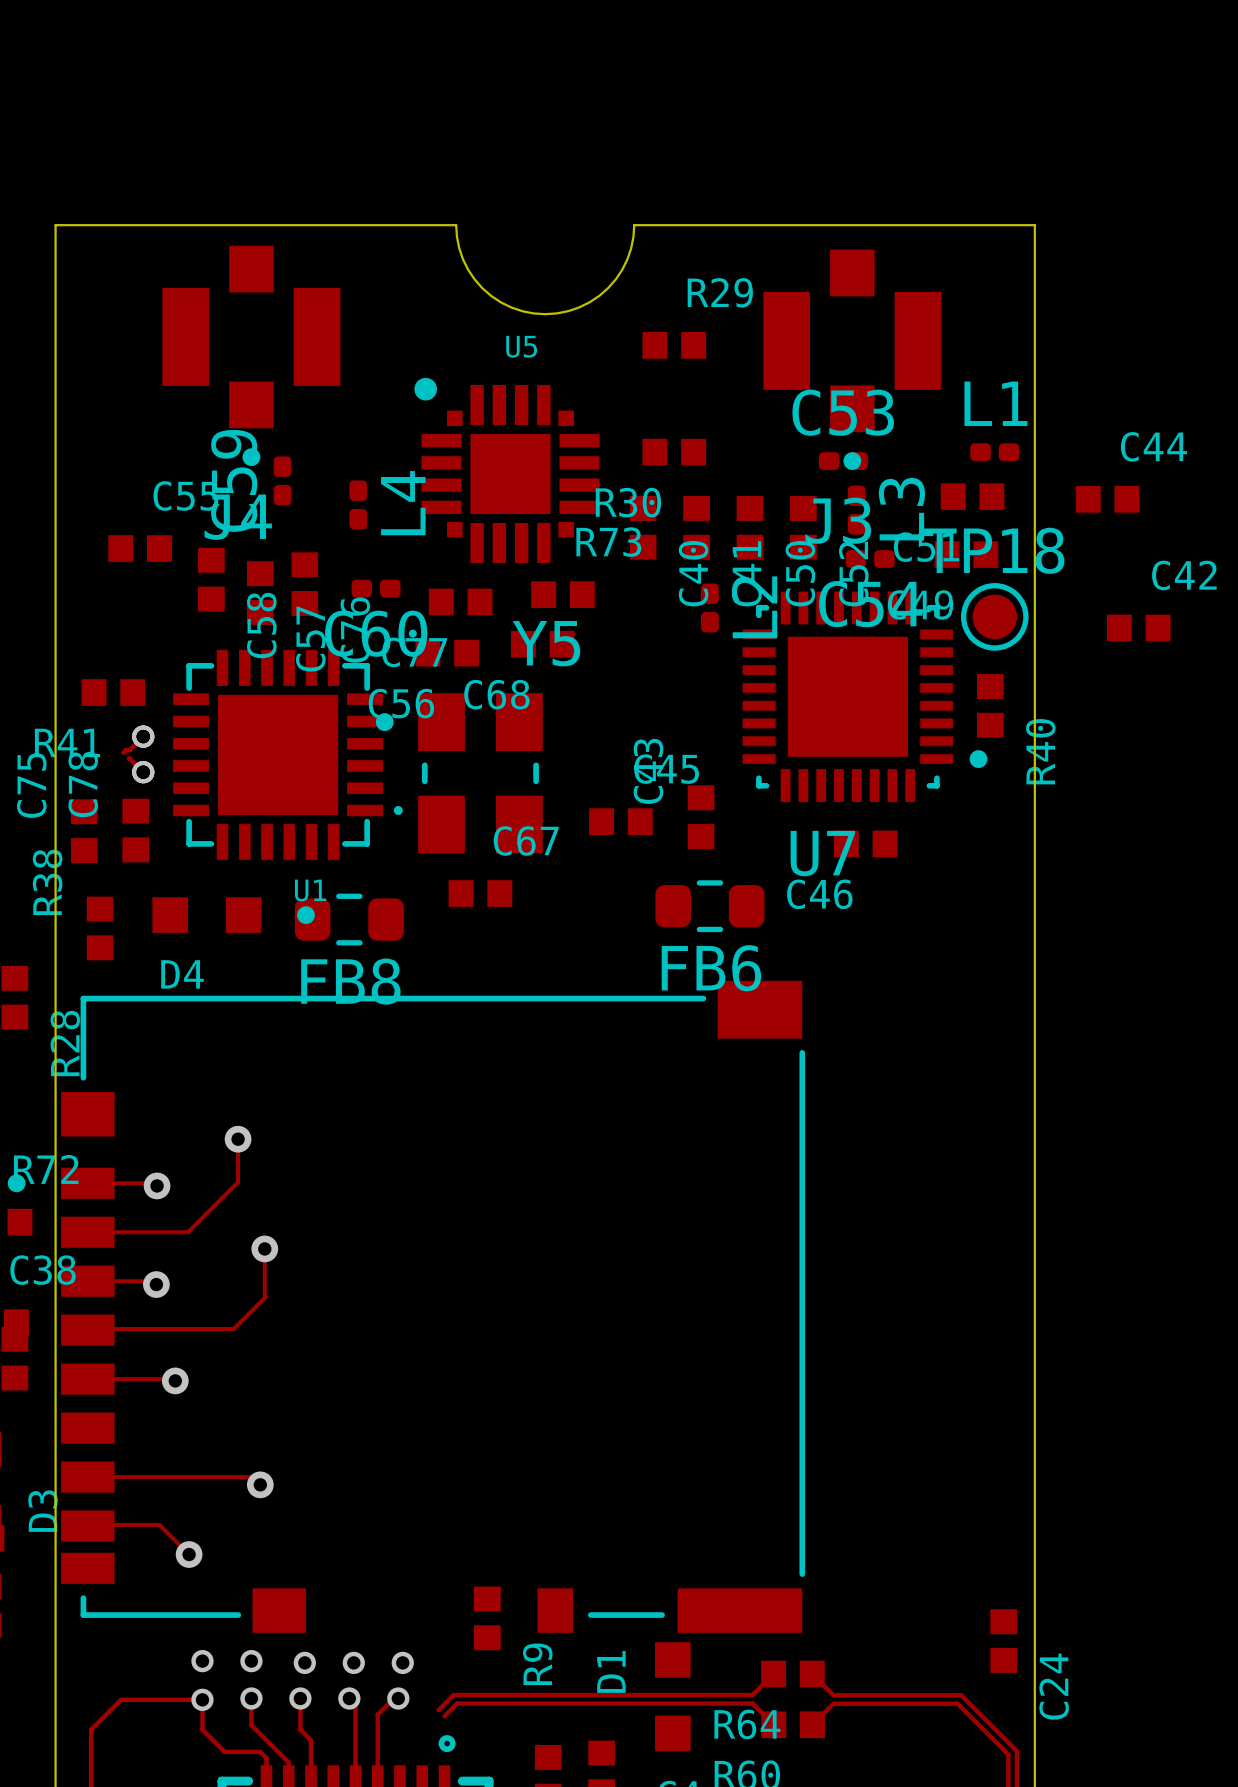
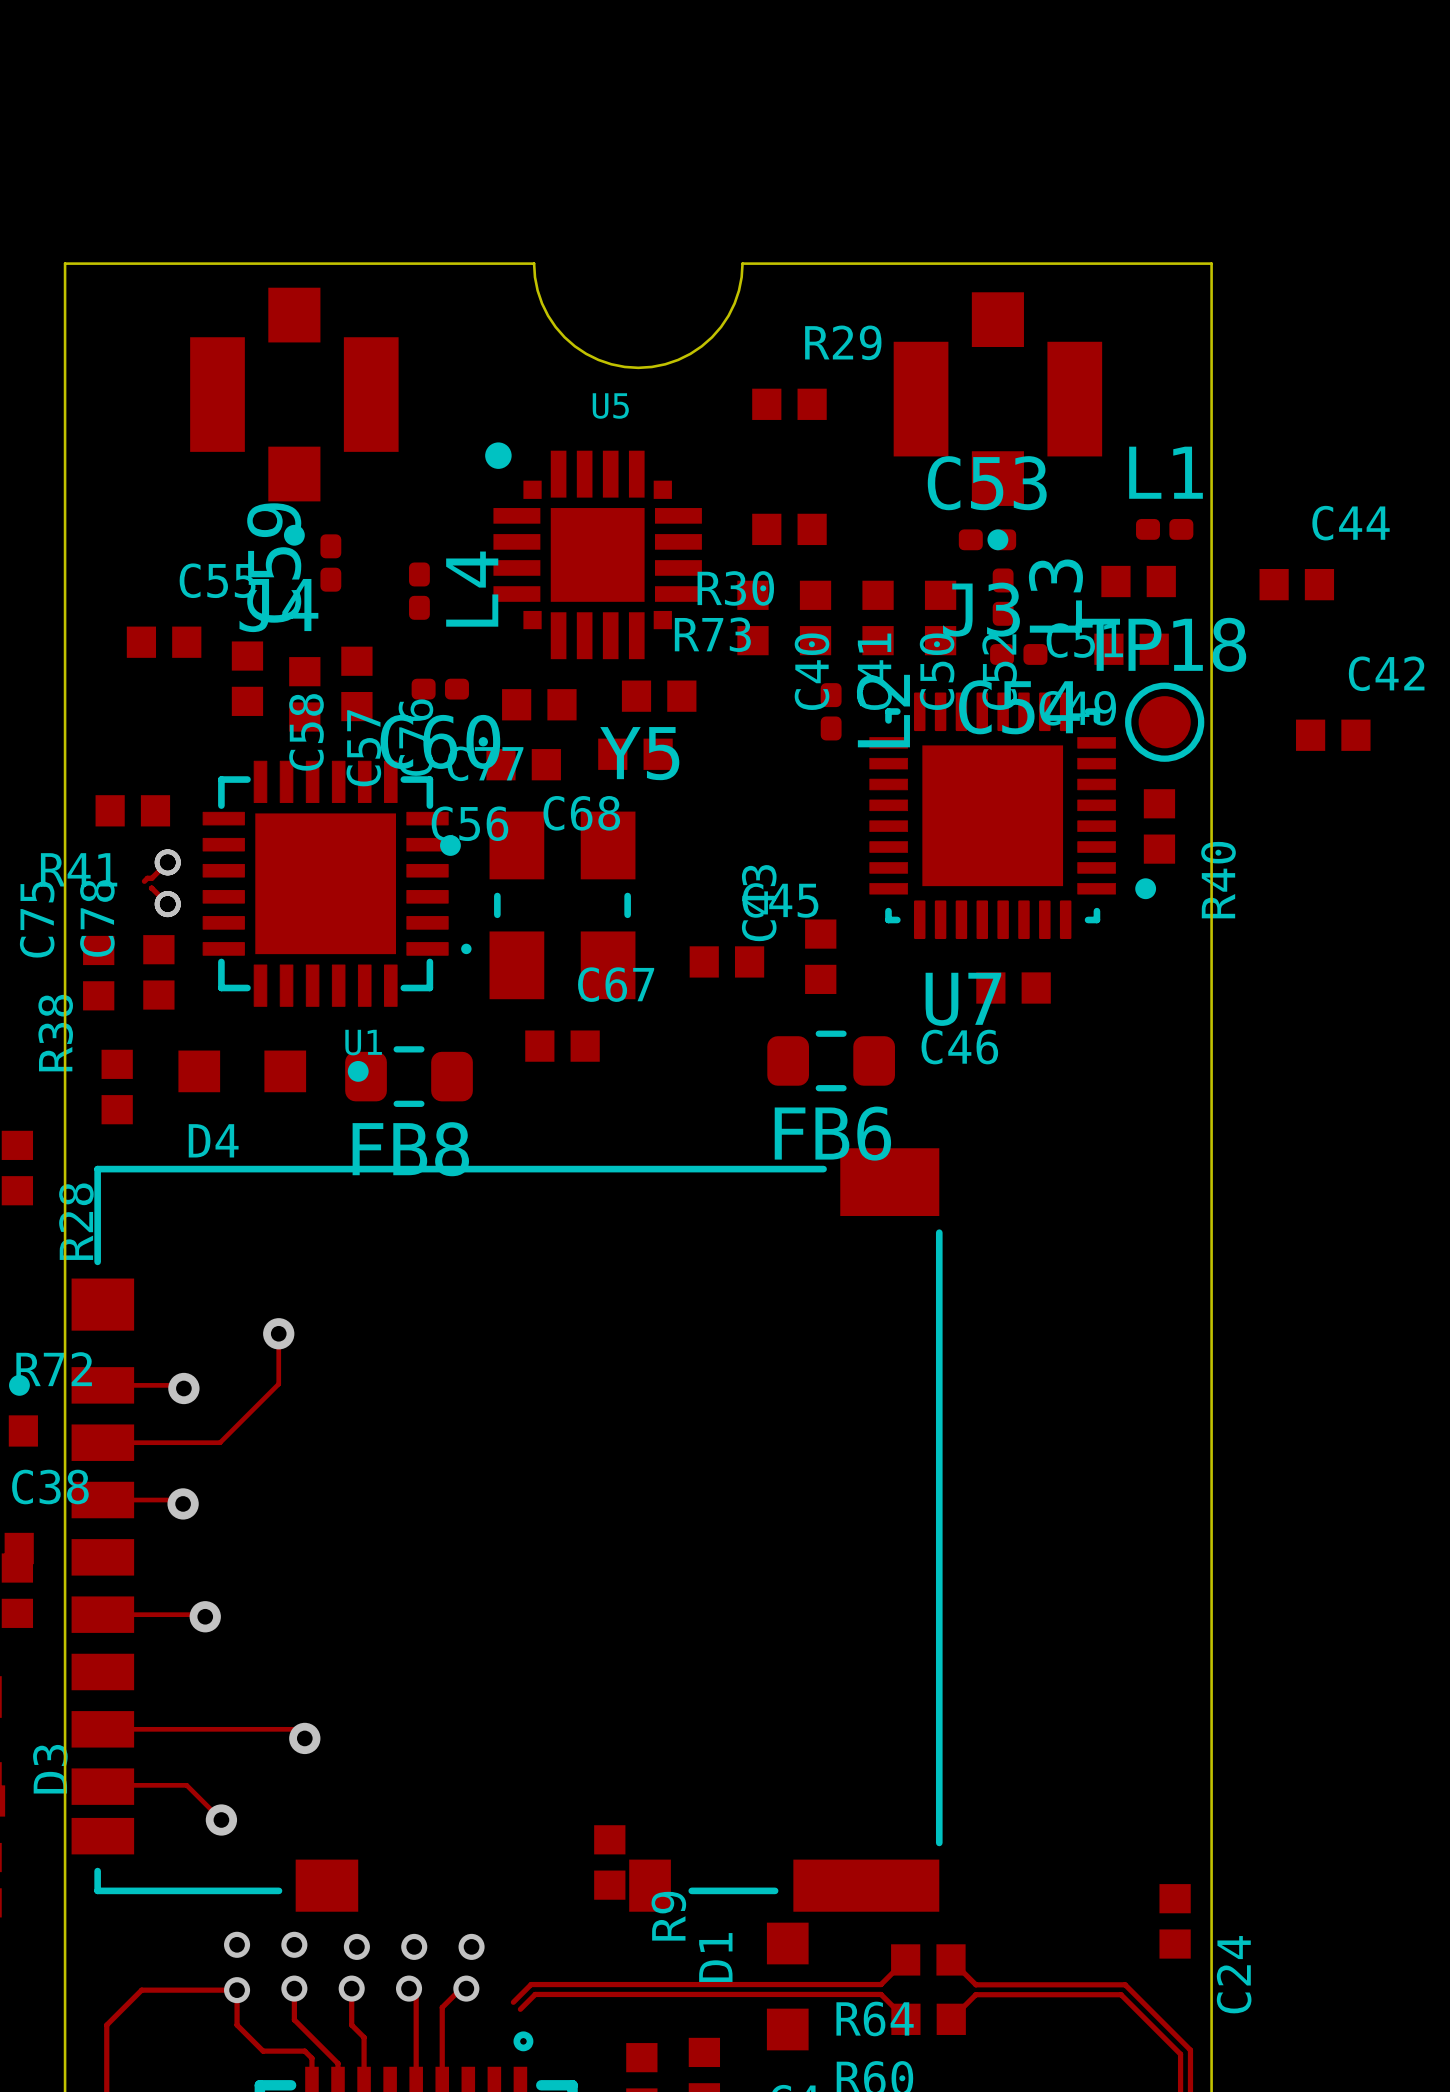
track: (264, 1248) (264, 1297) (233, 1329) (87, 1330) -> none
via: (264, 1248) -> none
R9 position: (487, 1618) -> (609, 1862)

